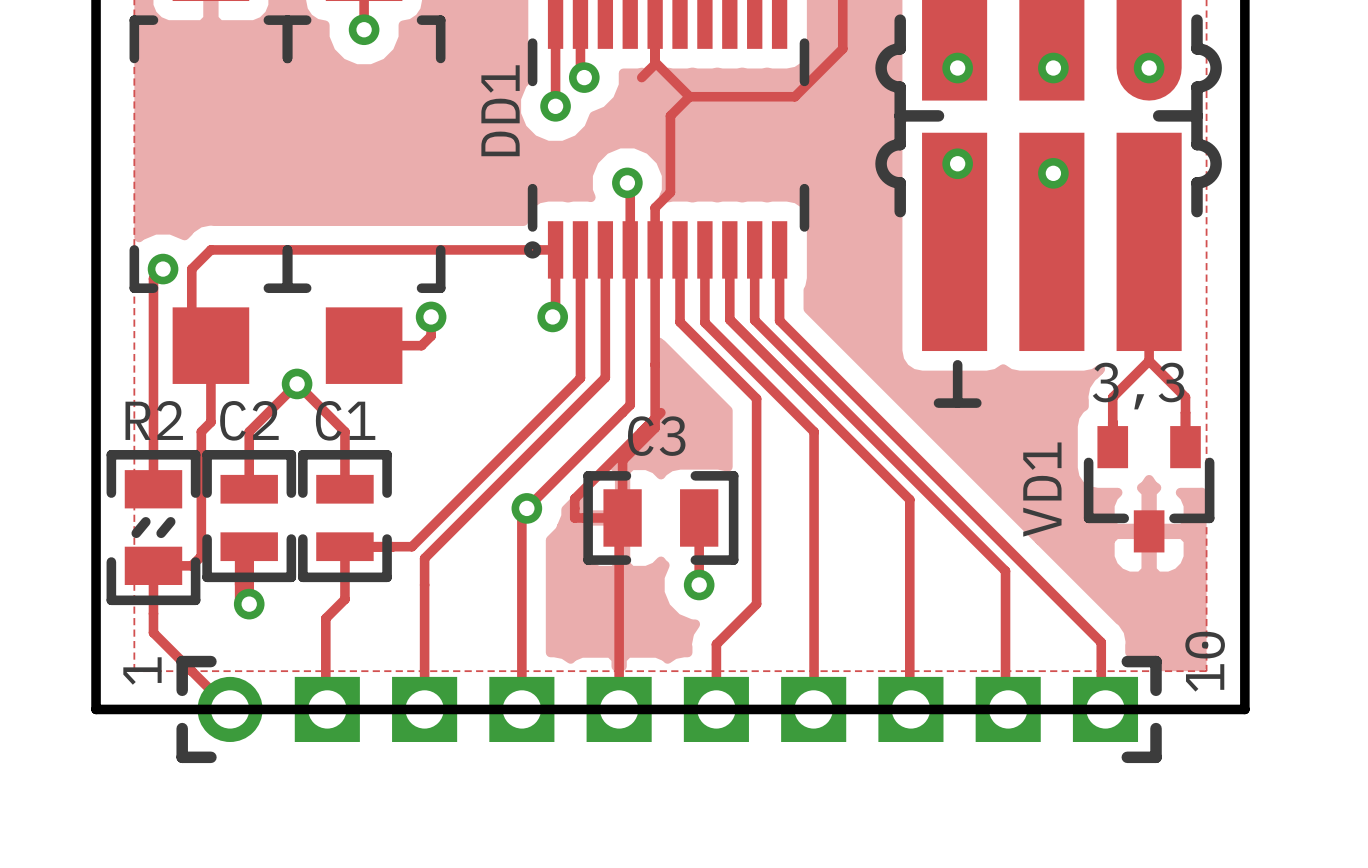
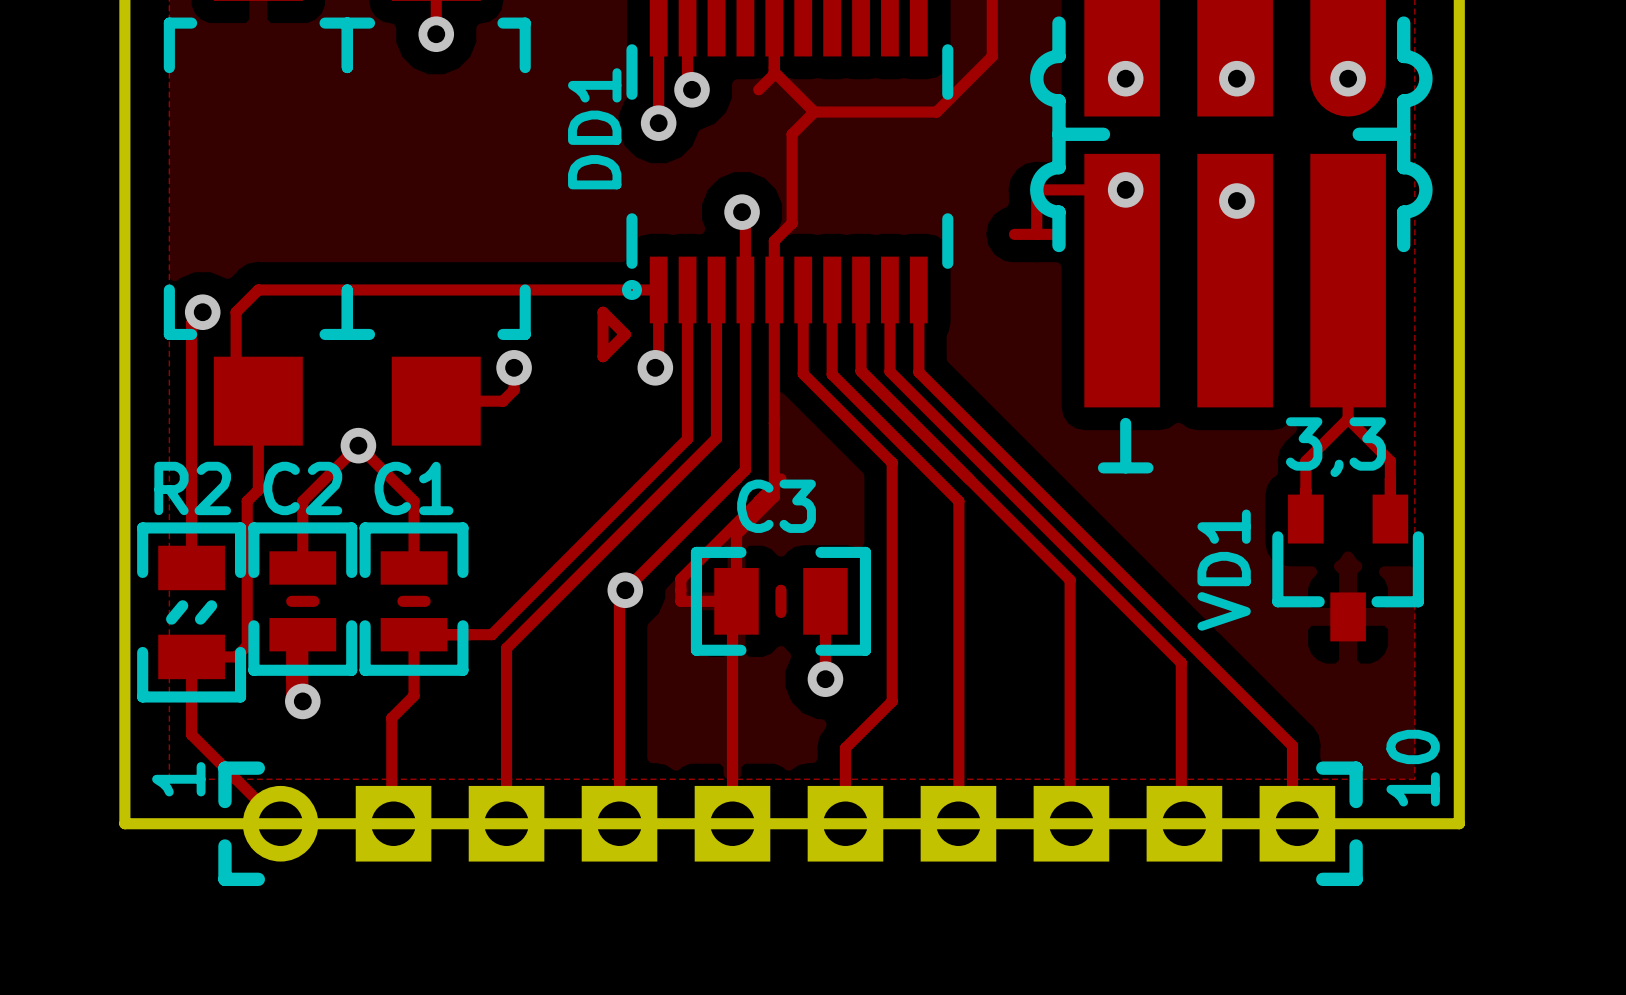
track: none -> (1125, 189) (1036, 189) (1036, 234)
track: none -> (1014, 234) (1058, 234)
track: none -> (603, 312) (625, 334) (603, 356) (603, 312)
track: none -> (780, 590) (780, 612)
track: none -> (291, 601) (313, 601)
track: none -> (402, 601) (425, 601)

